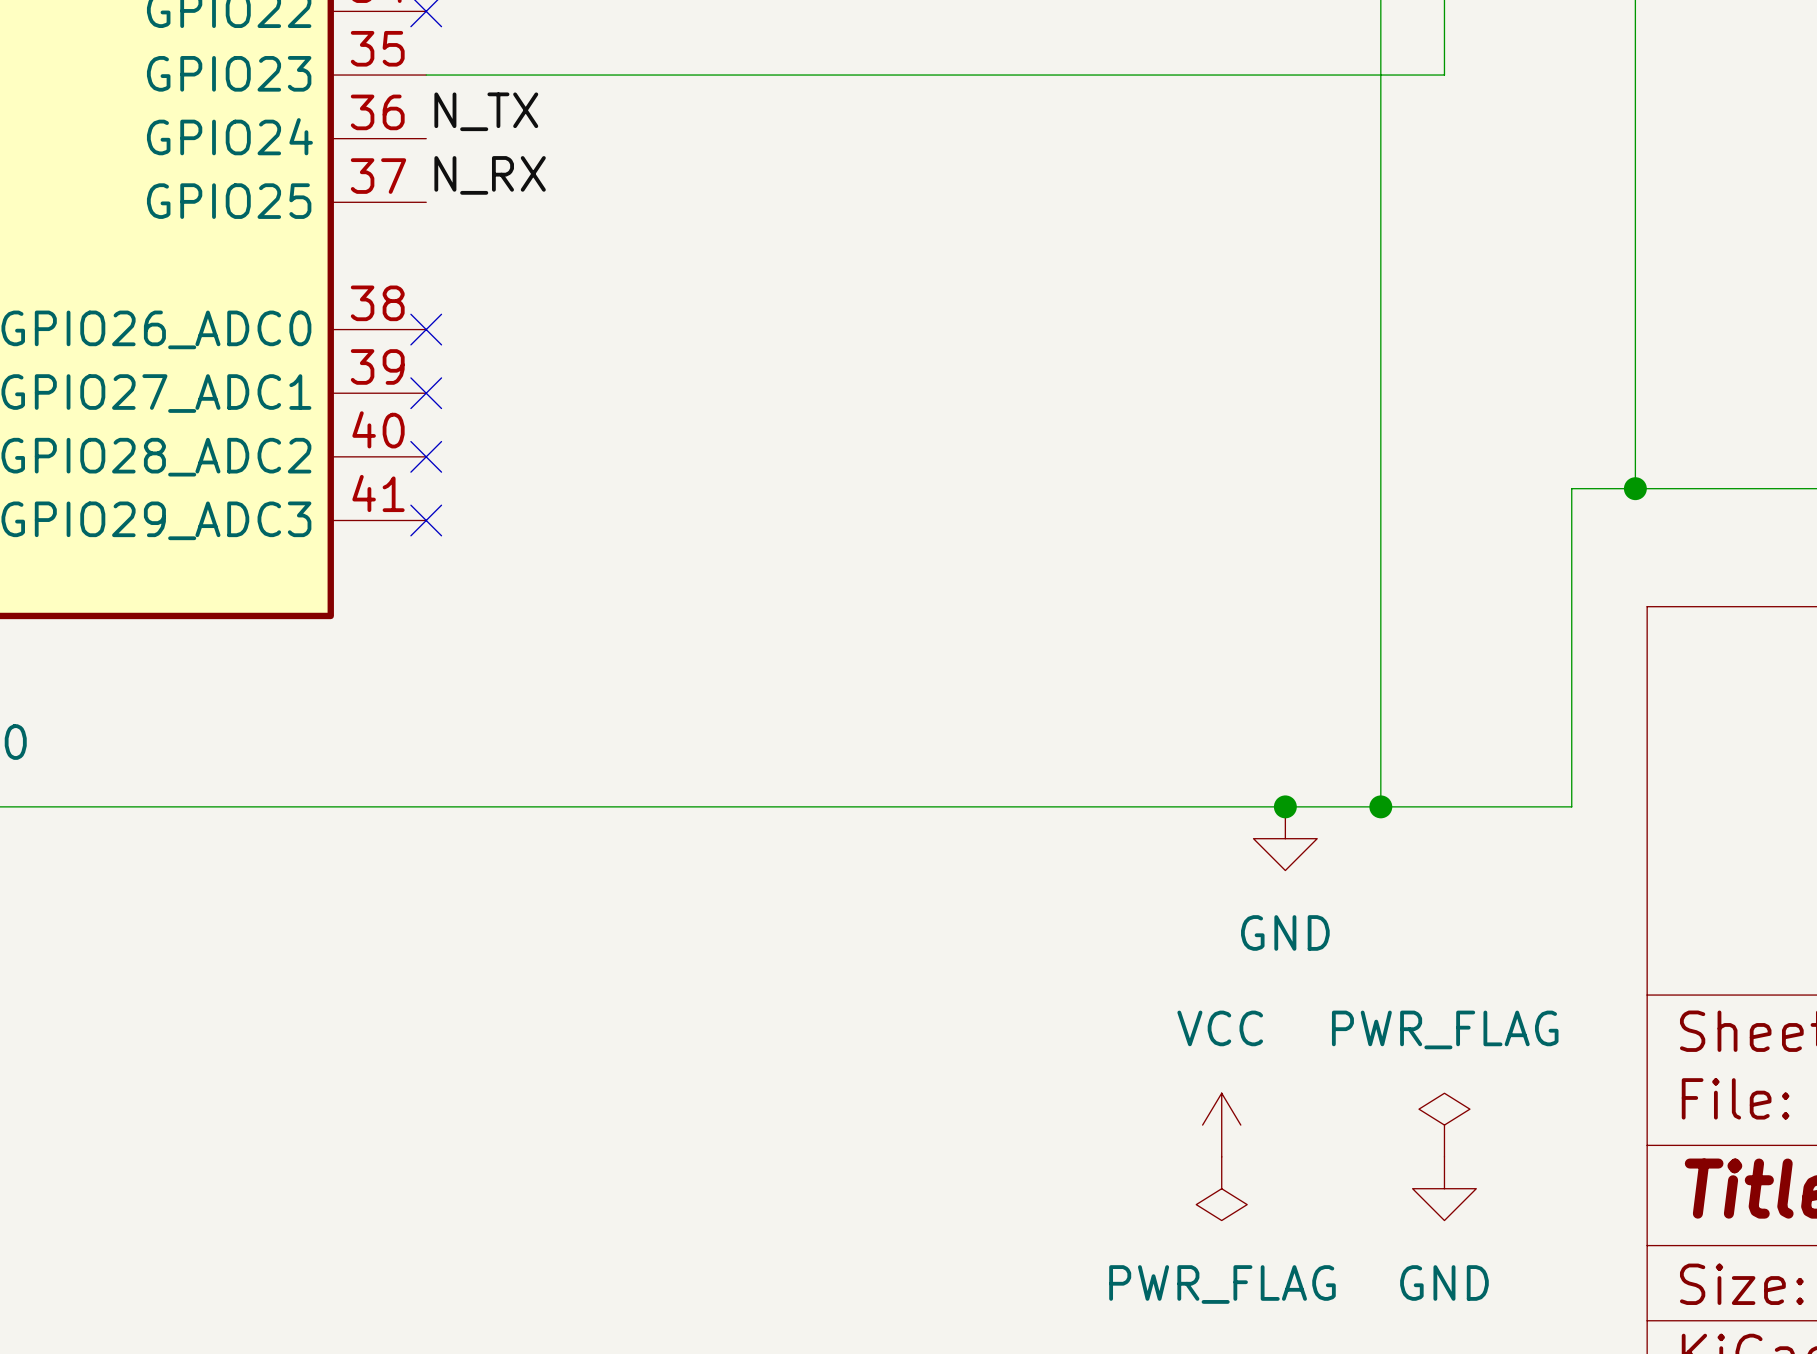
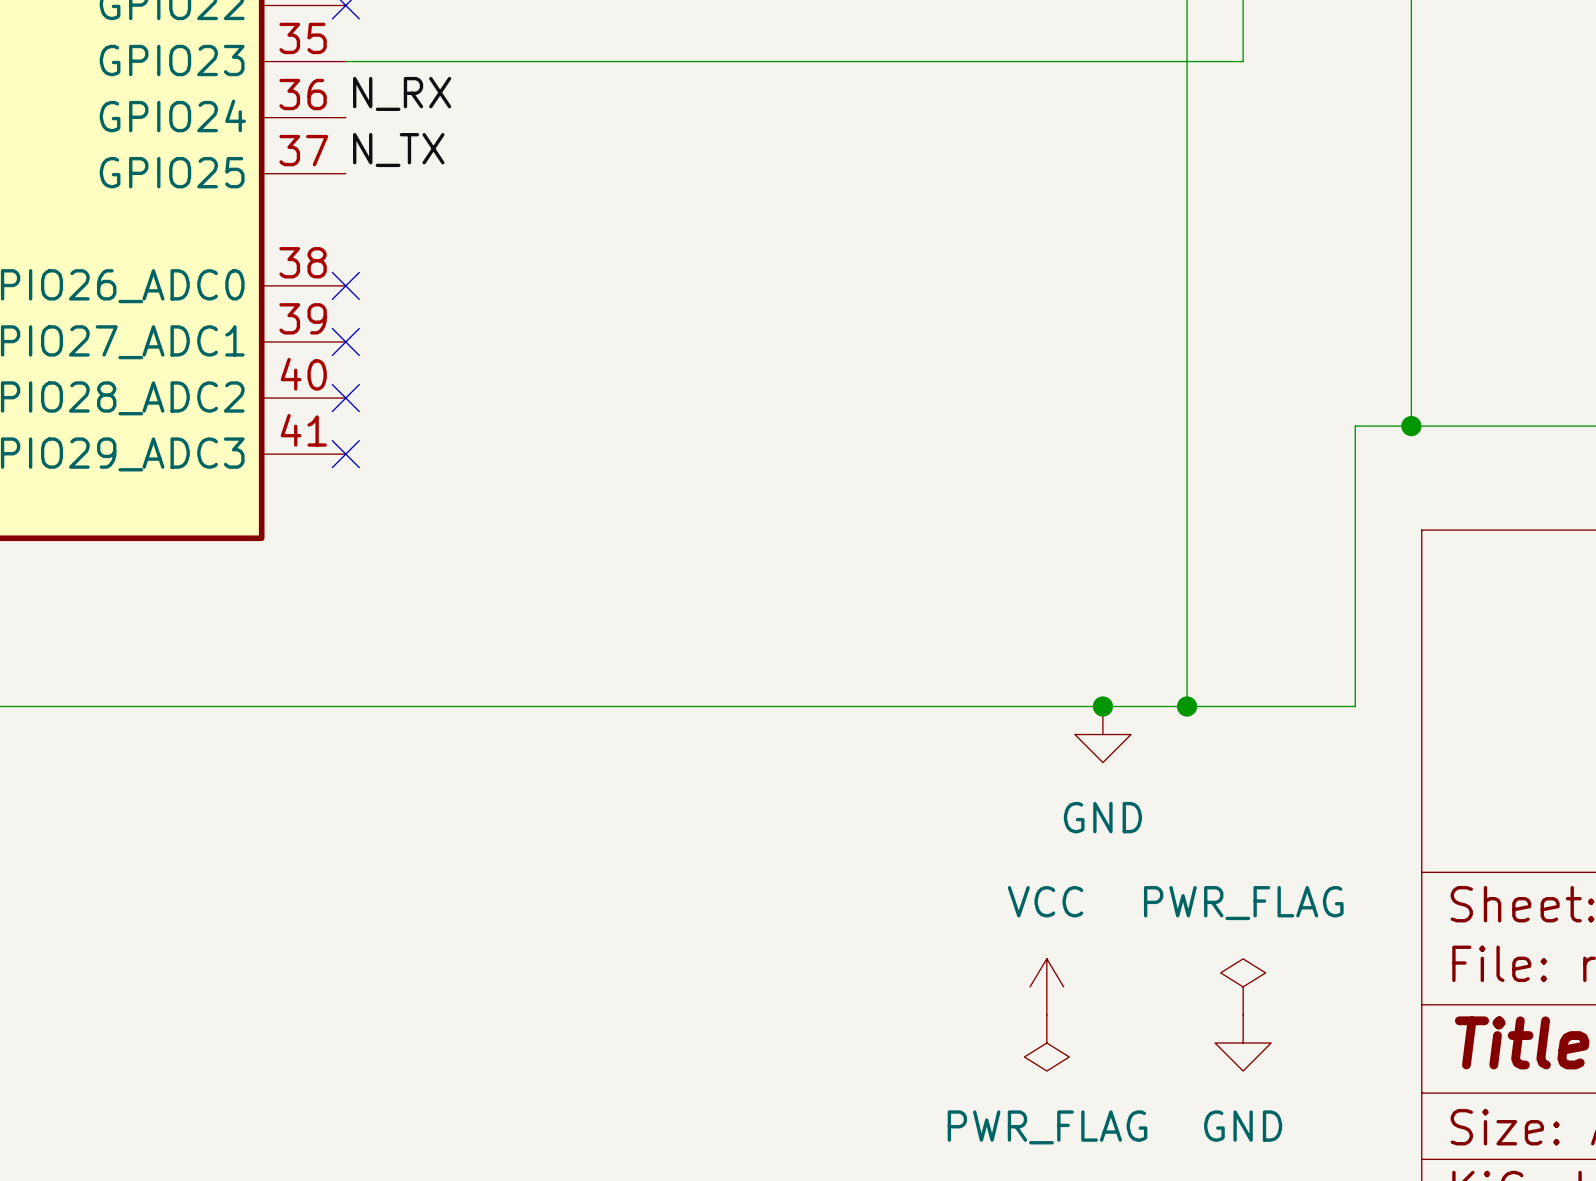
label: N_TX (486, 111) -> N_RX (402, 93)
label: N_RX (490, 175) -> N_TX (398, 150)

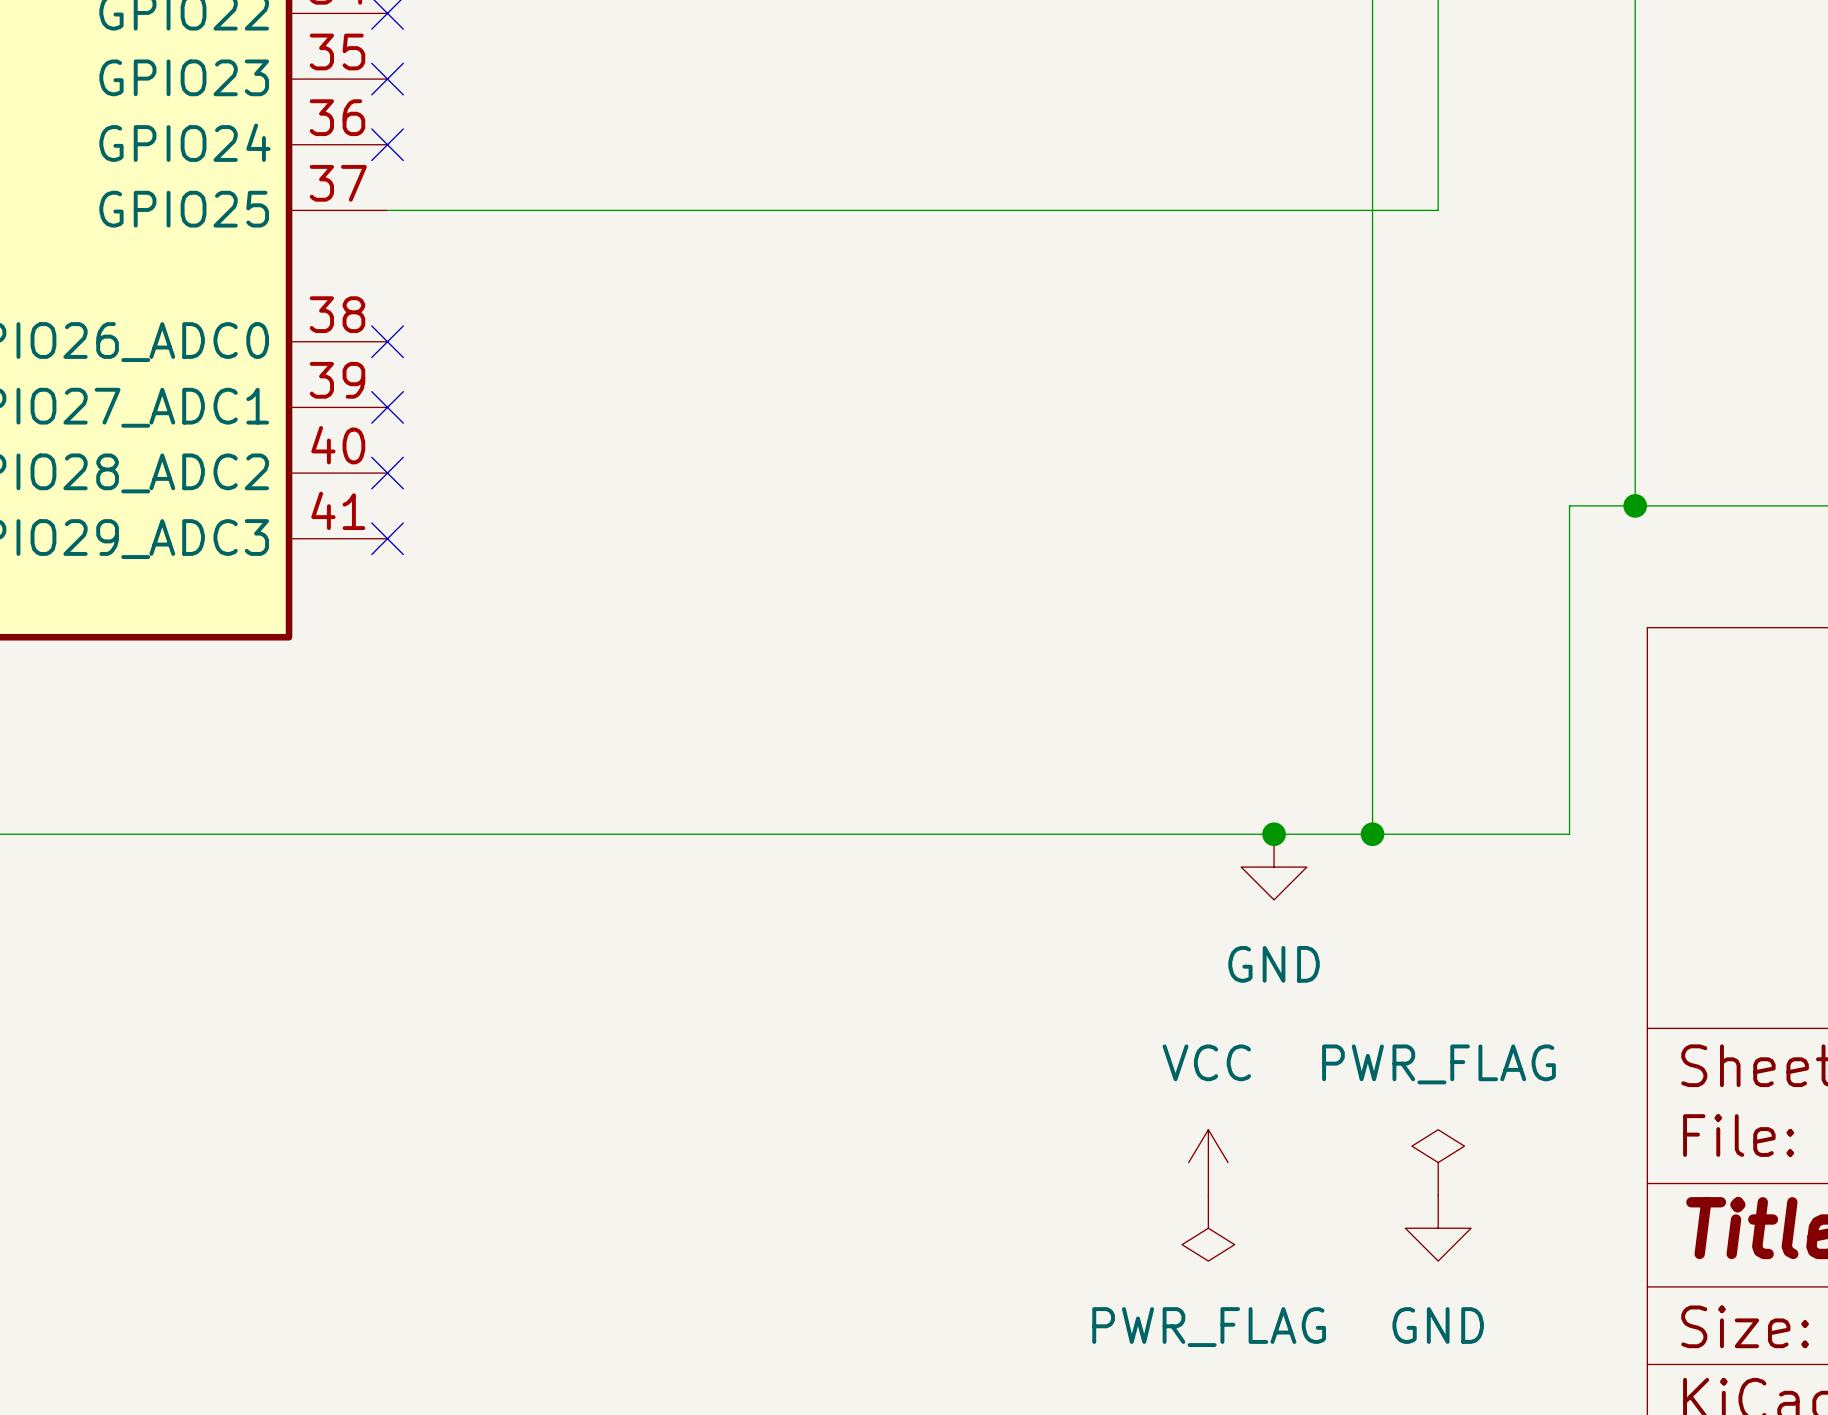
wire: (345, 61) (1243, 61) -> (387, 210) (1438, 210) (1438, 79)
no-connect mark: none -> (387, 79)
label: N_RX (402, 93) -> none
no-connect mark: none -> (387, 144)
label: N_TX (398, 150) -> none

